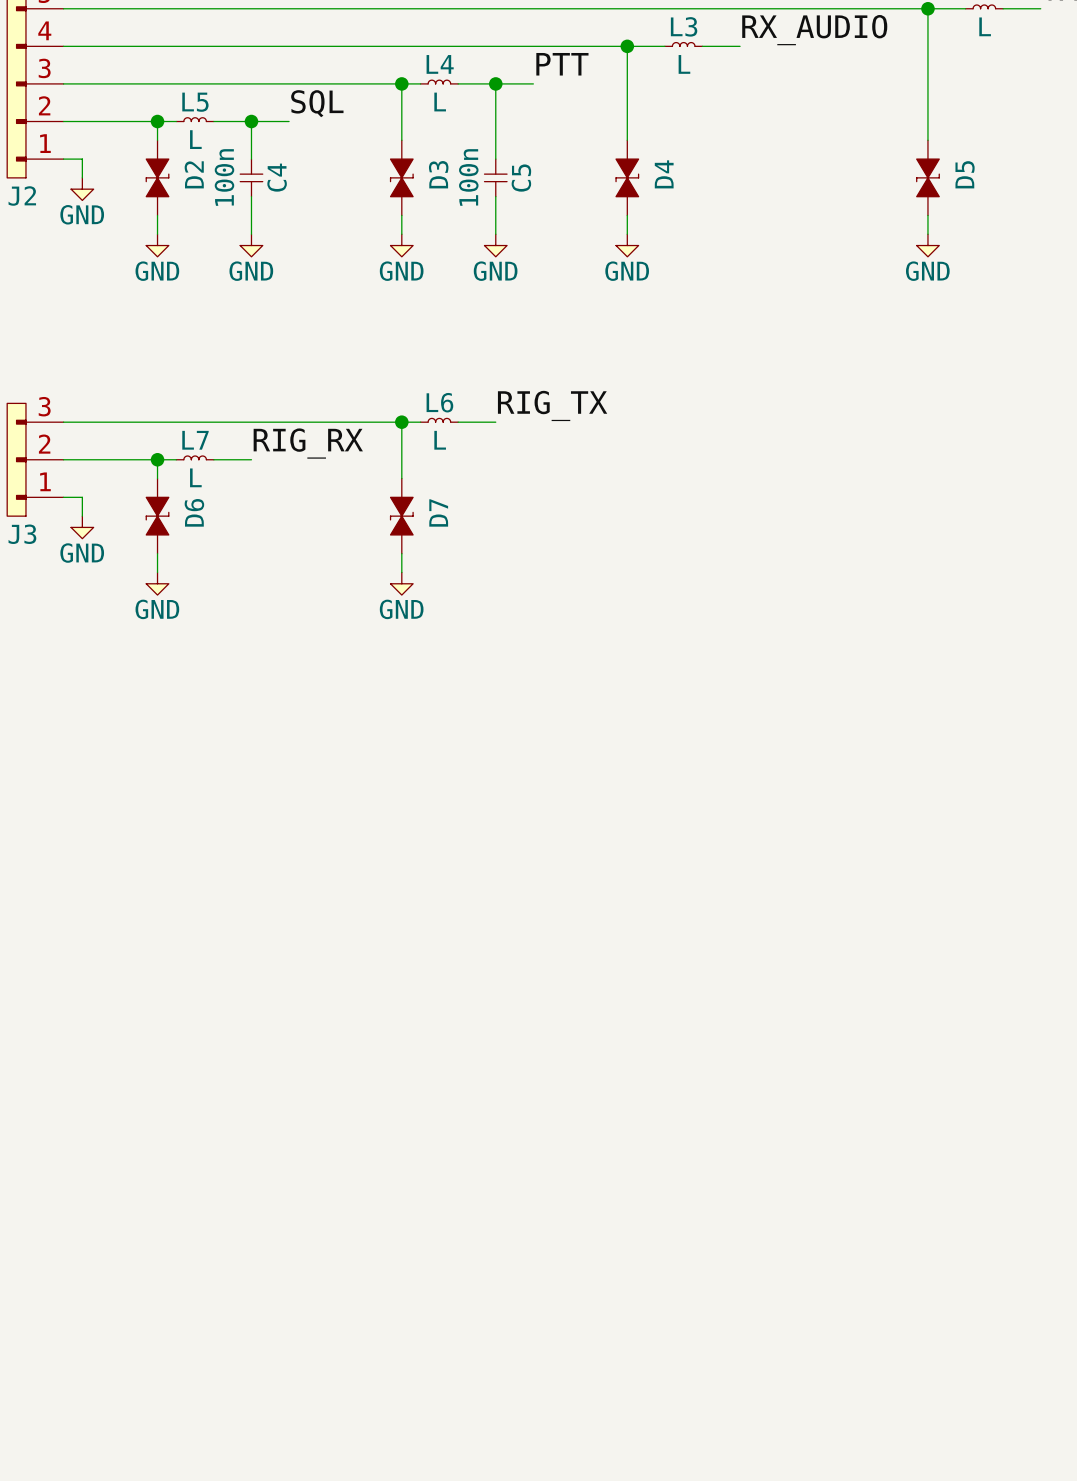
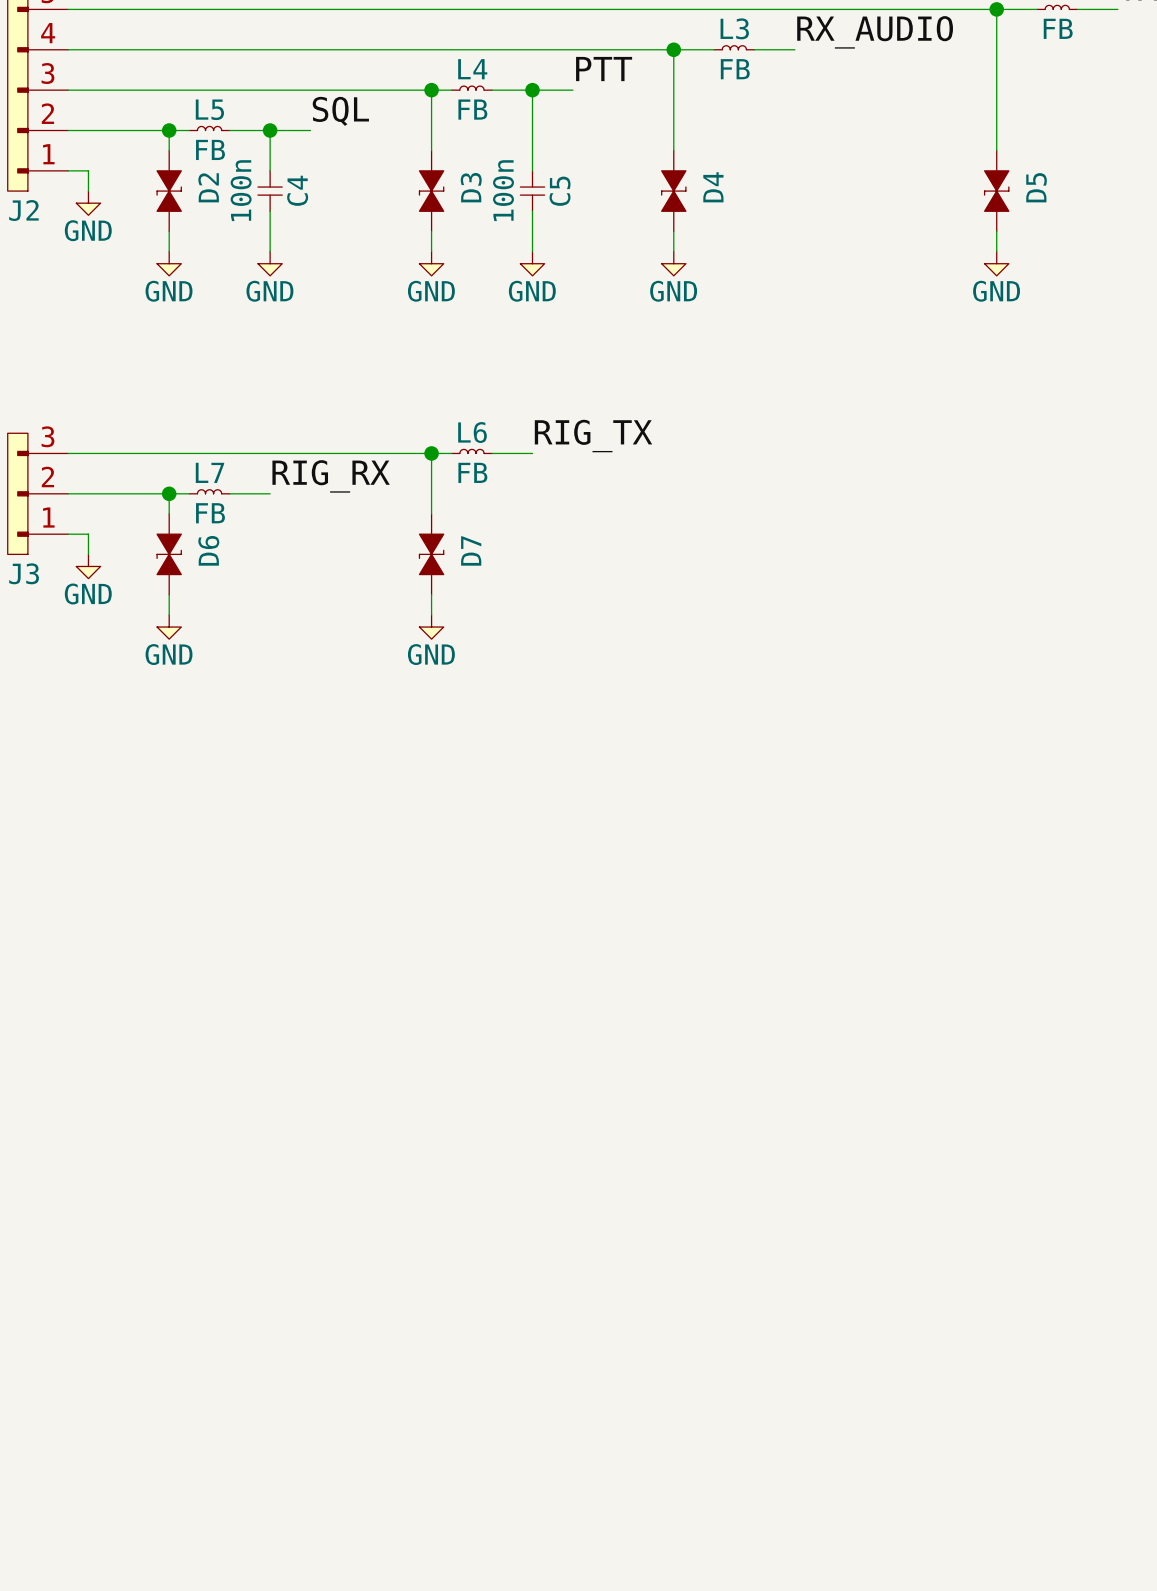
part value: L (985, 26) -> FB (1058, 28)
L3 value: L (684, 64) -> FB (735, 69)
L4 value: L (440, 102) -> FB (472, 109)
L5 value: L (195, 139) -> FB (210, 149)
L6 value: L (440, 440) -> FB (472, 472)
L7 value: L (195, 477) -> FB (210, 513)

